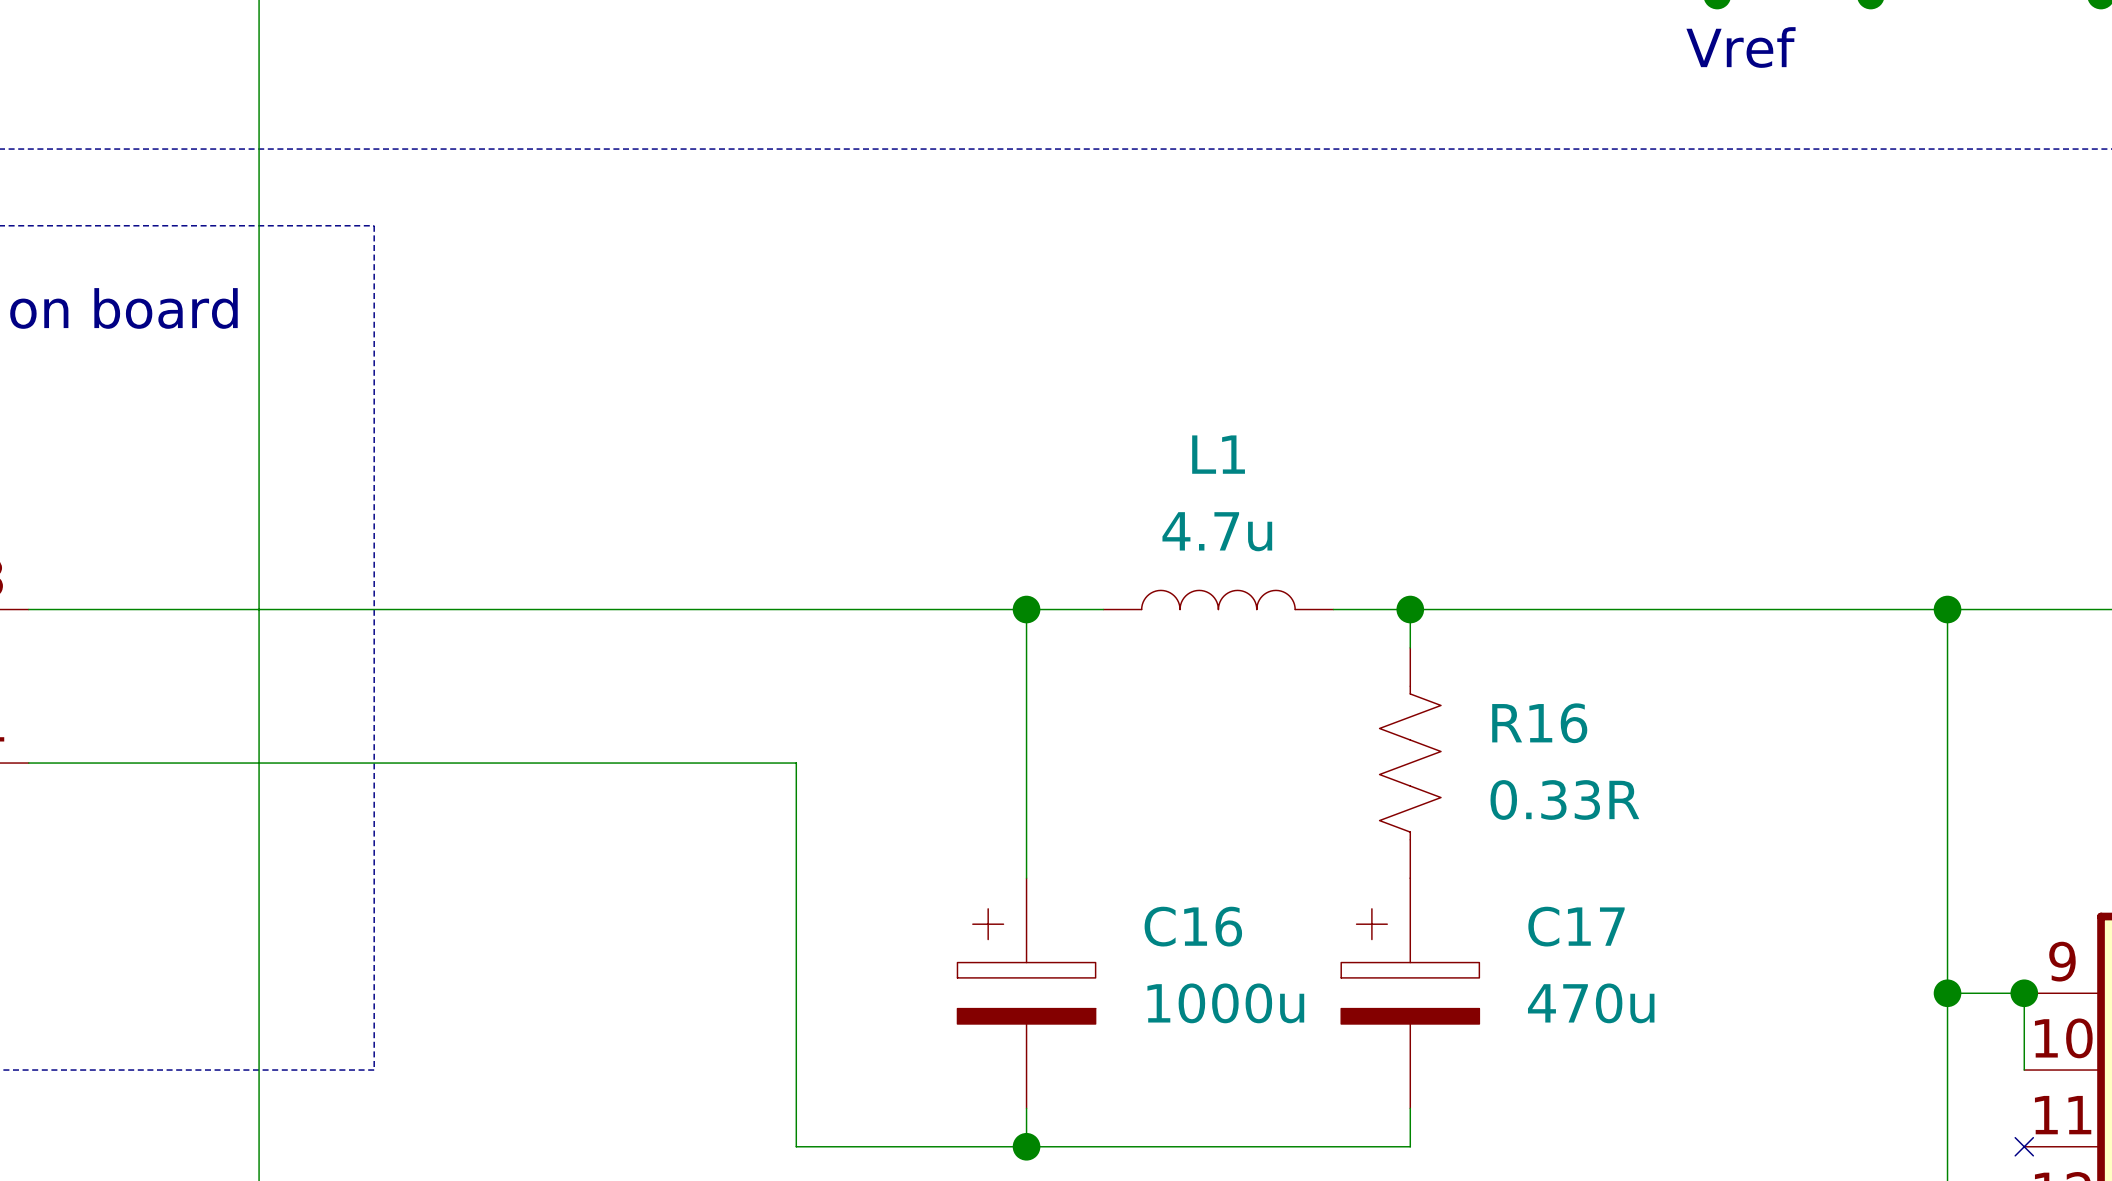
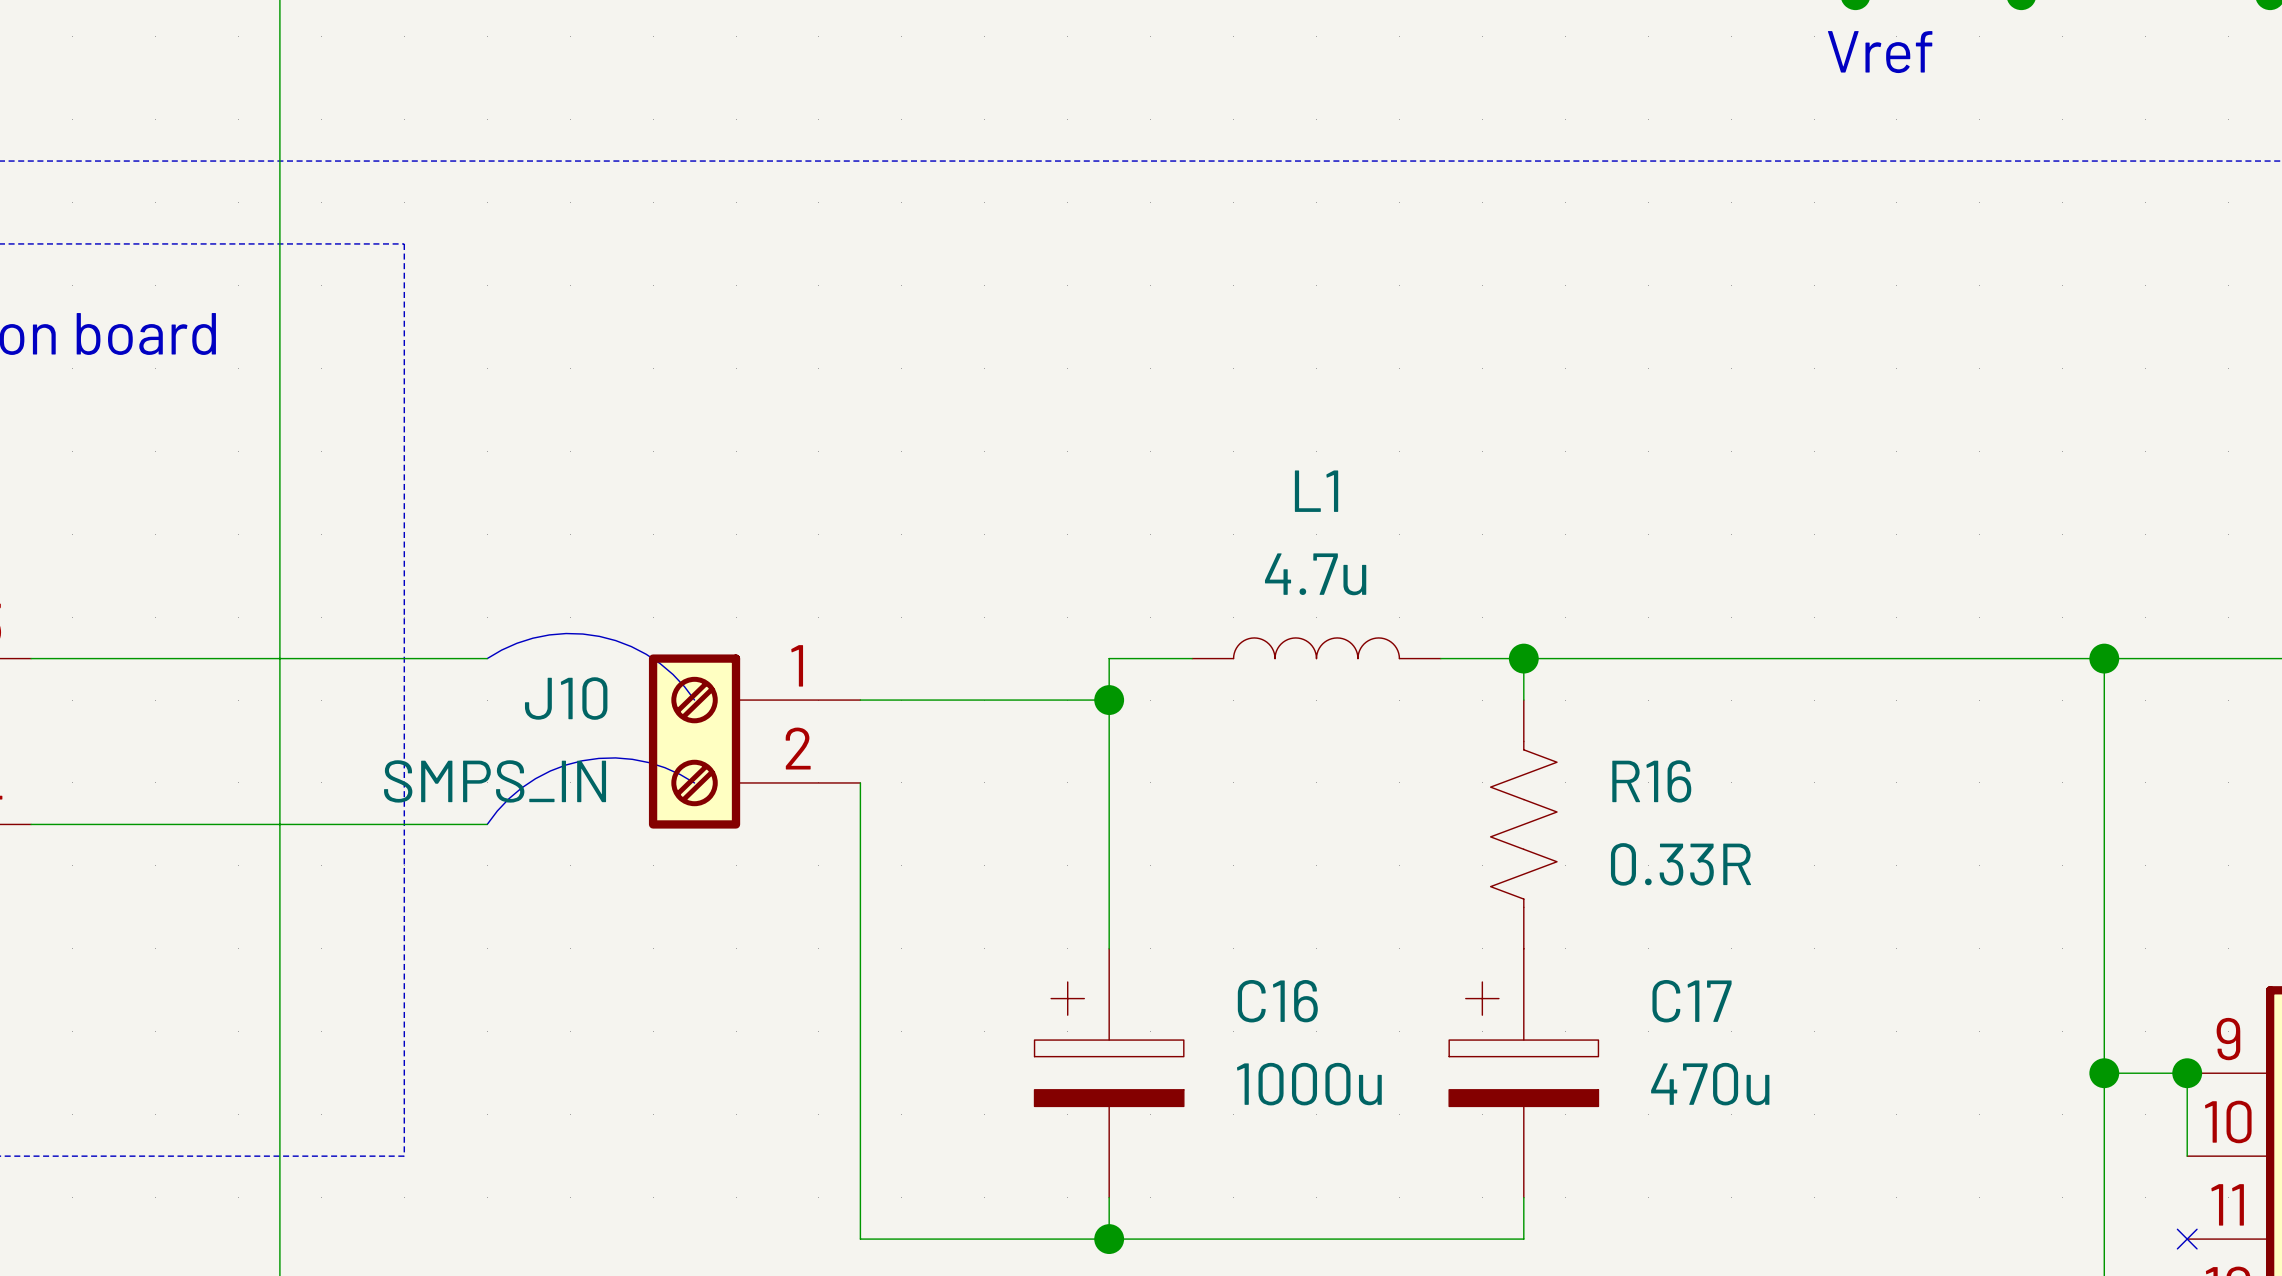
line: none -> (487, 658) (516, 643) (549, 634) (566, 633) (599, 636) (631, 646) (660, 663) (684, 686) (694, 700)
wire: (450, 609) (1026, 609) -> none
junction position: (1026, 609) -> (1109, 700)
wire: none -> (860, 700) (1109, 700)
J10: none -> SMPS_IN (754, 741)
line: none -> (694, 782) (680, 774) (648, 762) (615, 757) (582, 760) (550, 770) (535, 778) (508, 798) (487, 824)
wire: (450, 763) (796, 763) -> (860, 782) (860, 824)

